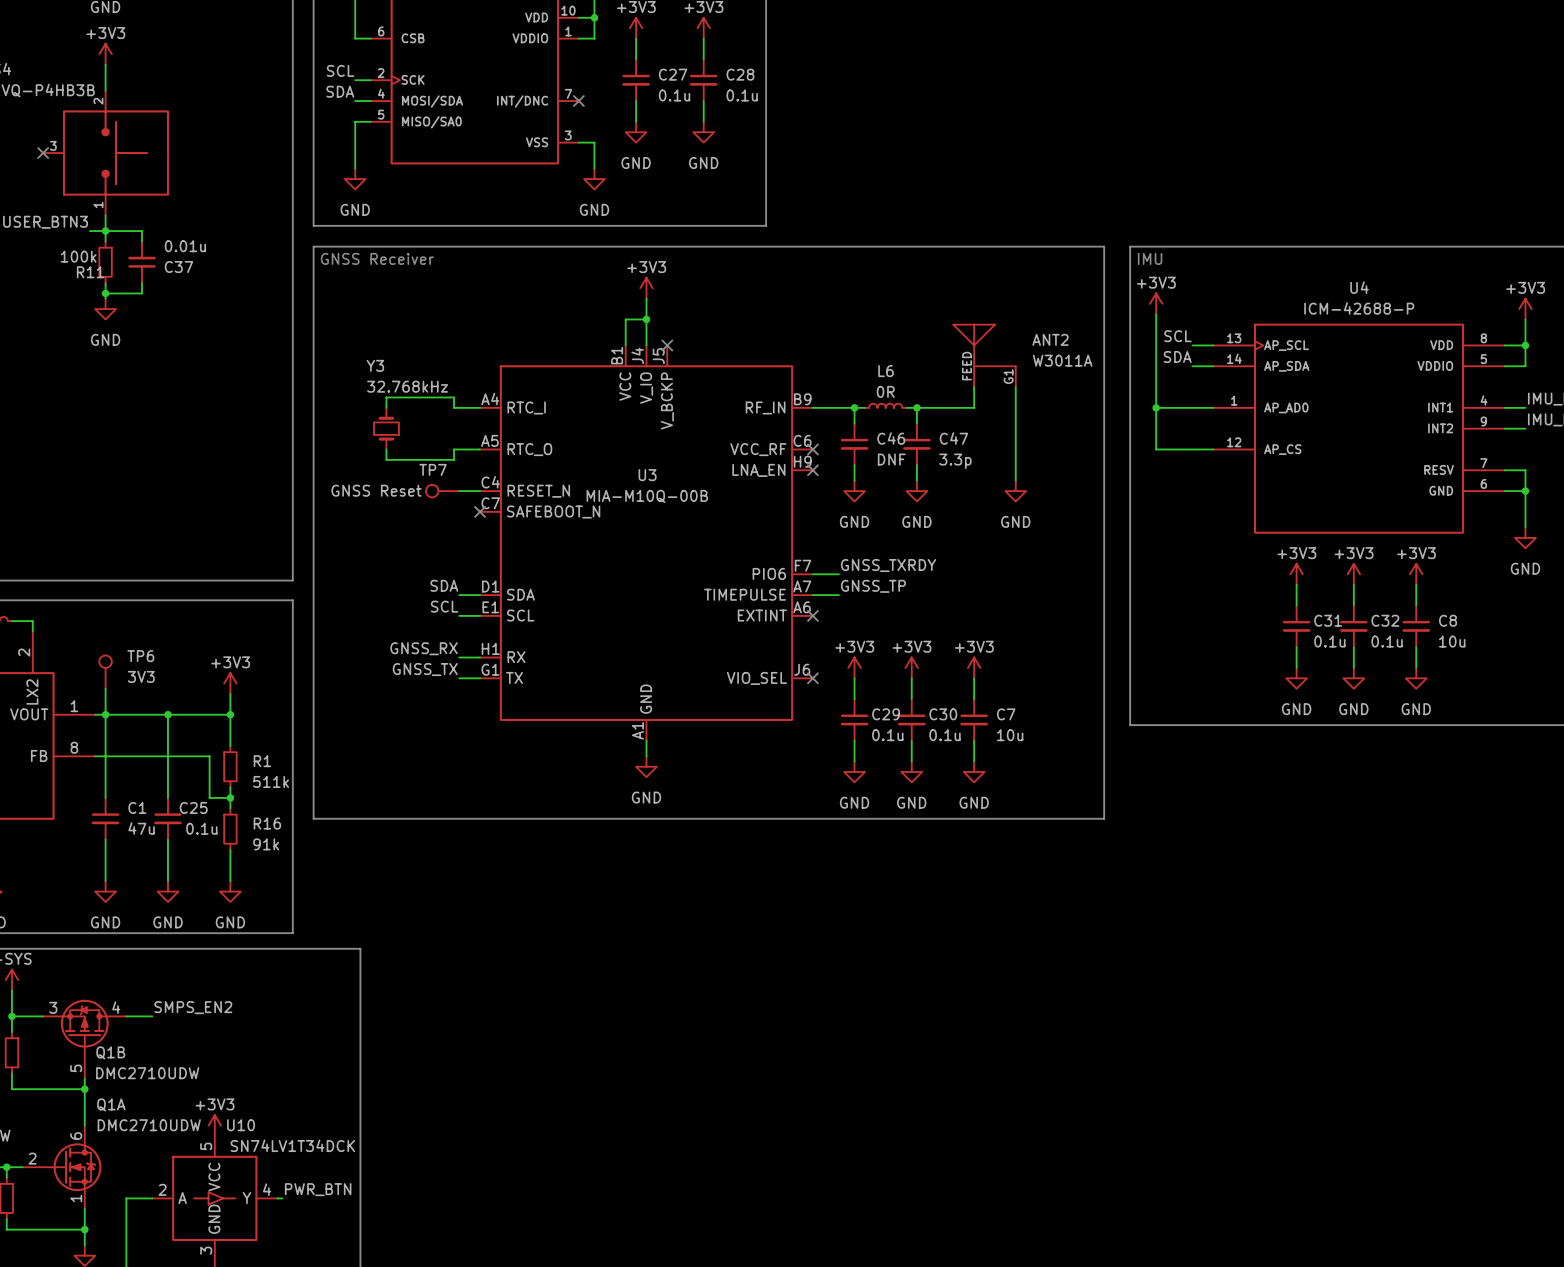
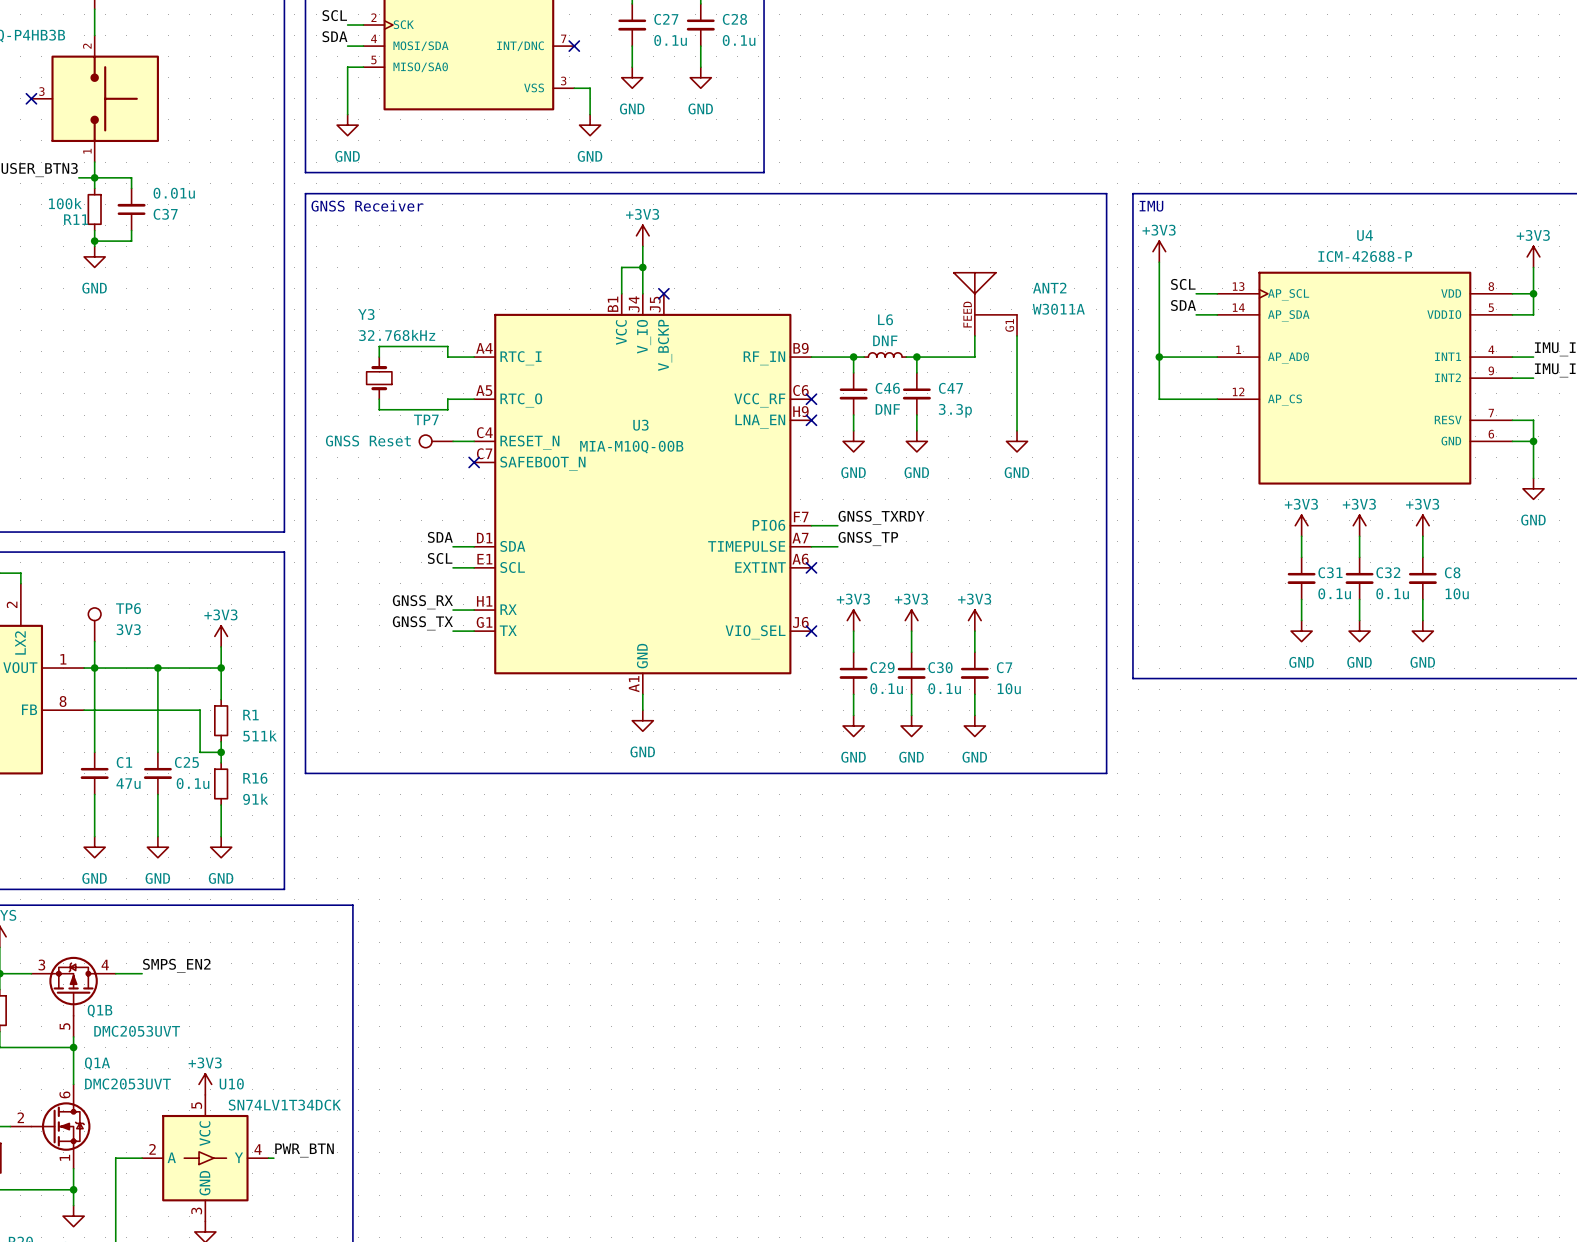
L6 value: 0R (885, 391) -> DNF (885, 340)
Q1B value: DMC2710UDW (147, 1073) -> DMC2053UVT (137, 1031)
Q1A value: DMC2710UDW (149, 1125) -> DMC2053UVT (127, 1084)

